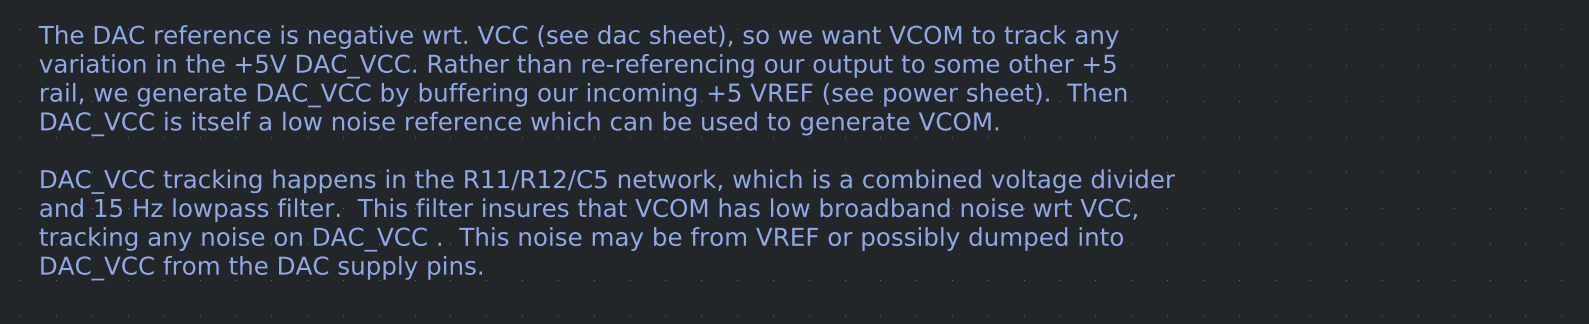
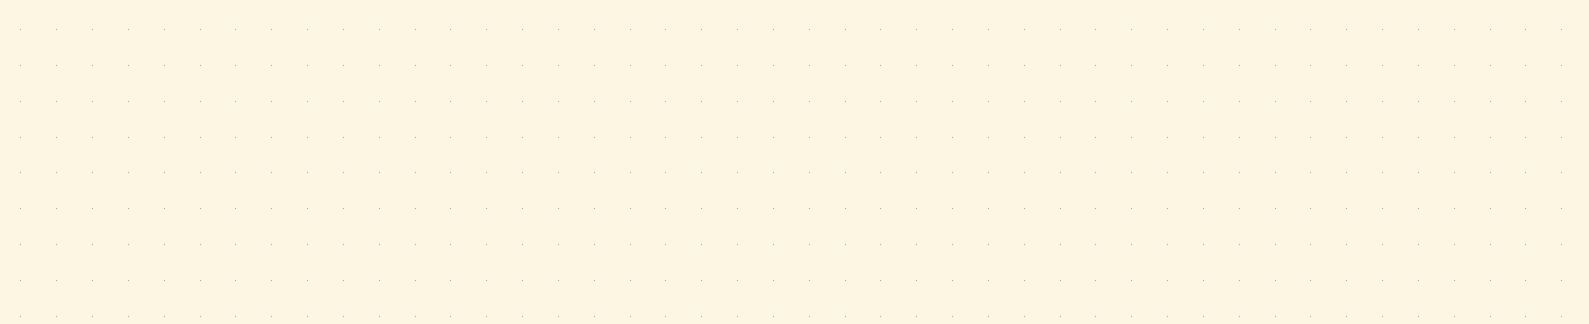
text: The DAC reference is negative wrt. VCC (see dac sheet), so we want VCOM to track any (578, 37) -> none
text: variation in the +5V DAC_VCC. Rather than re-referencing our output to some other +5 (577, 66) -> none
text: rail, we generate DAC_VCC by buffering our incoming +5 VREF (see power sheet). Then (583, 95) -> none
text: DAC_VCC is itself a low noise reference which can be used to generate VCOM. (519, 123) -> none
text: DAC_VCC tracking happens in the R11/R12/C5 network, which is a combined voltage divider (608, 181) -> none
text: and 15 Hz lowpass filter. This filter insures that VCOM has low broadband noise wrt VCC, (588, 210) -> none
text: tracking any noise on DAC_VCC . This noise may be from VREF or possibly dumped into (581, 239) -> none
text: DAC_VCC from the DAC supply pins. (261, 268) -> none

